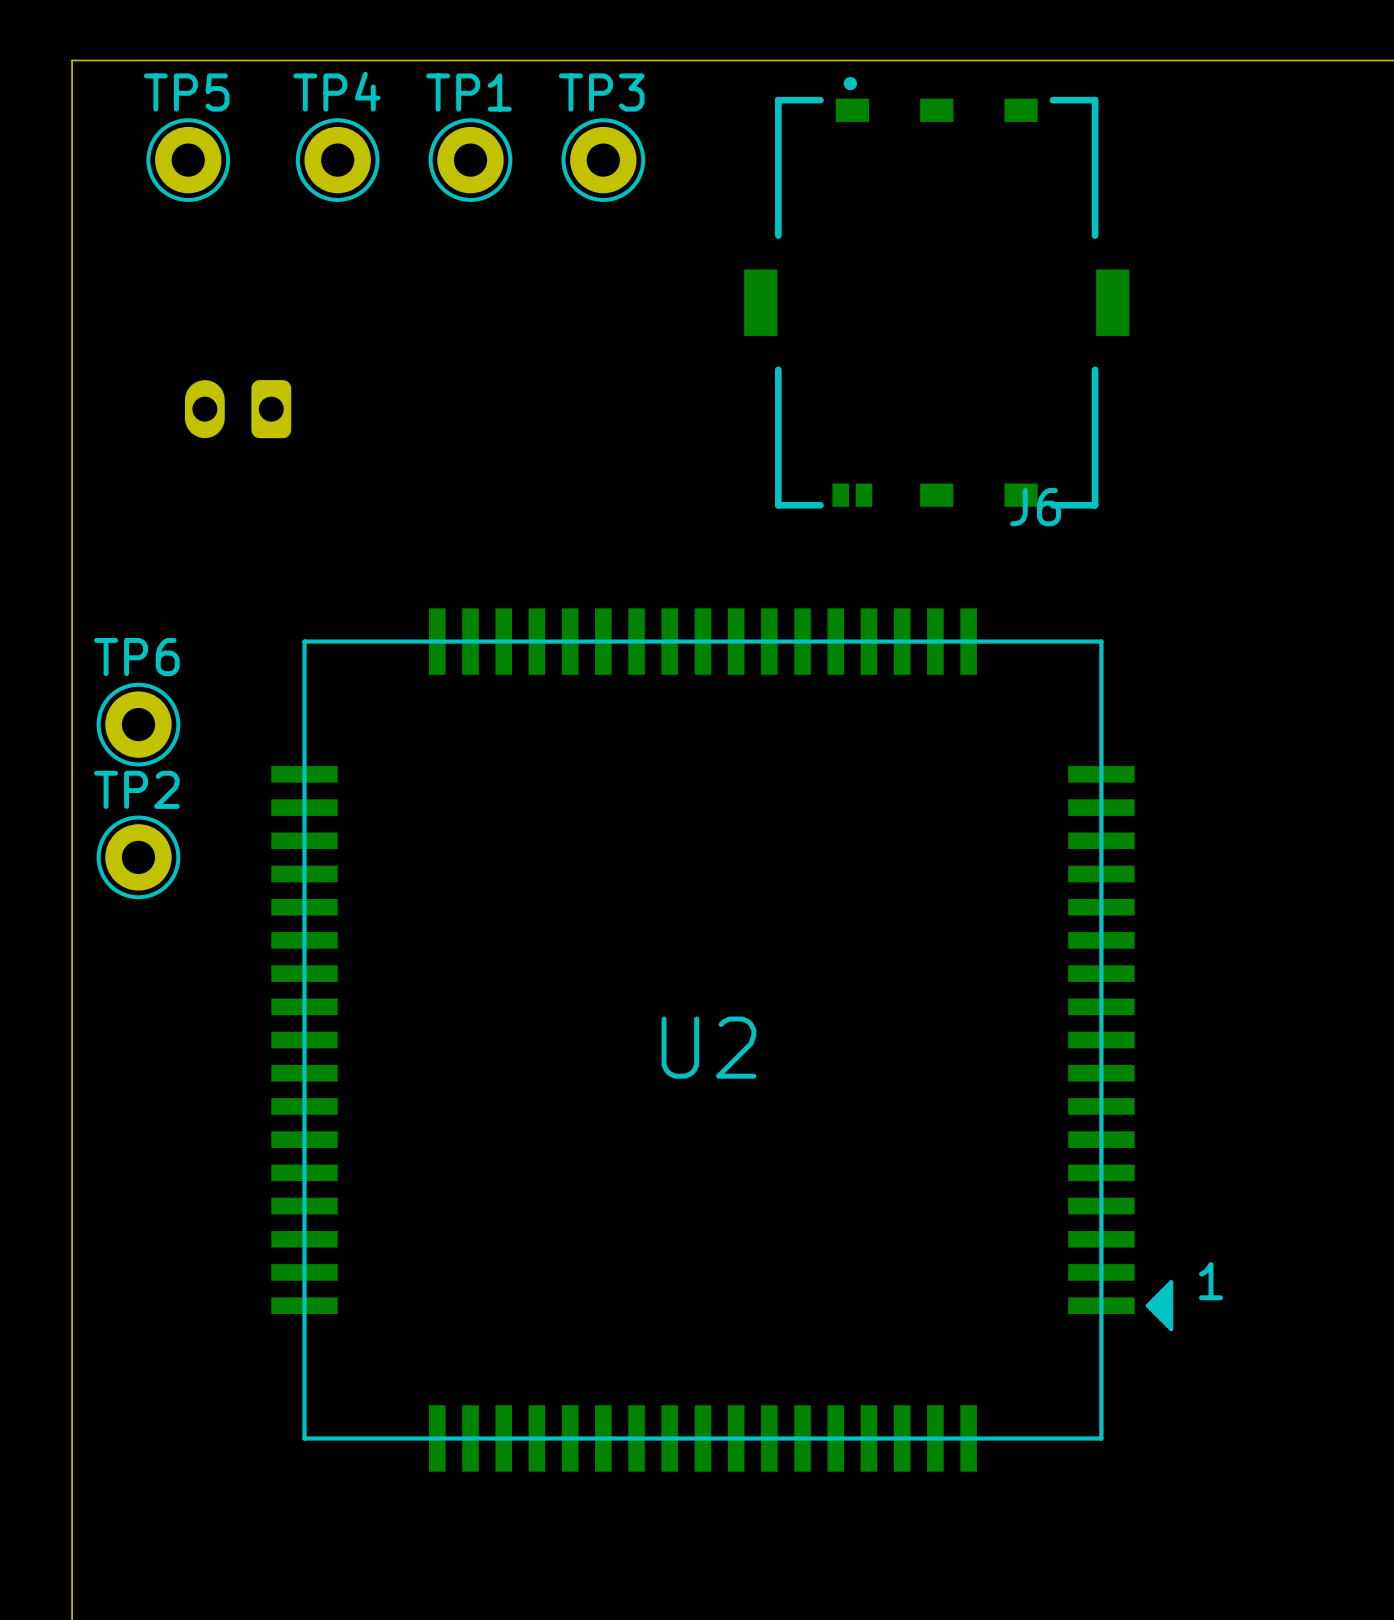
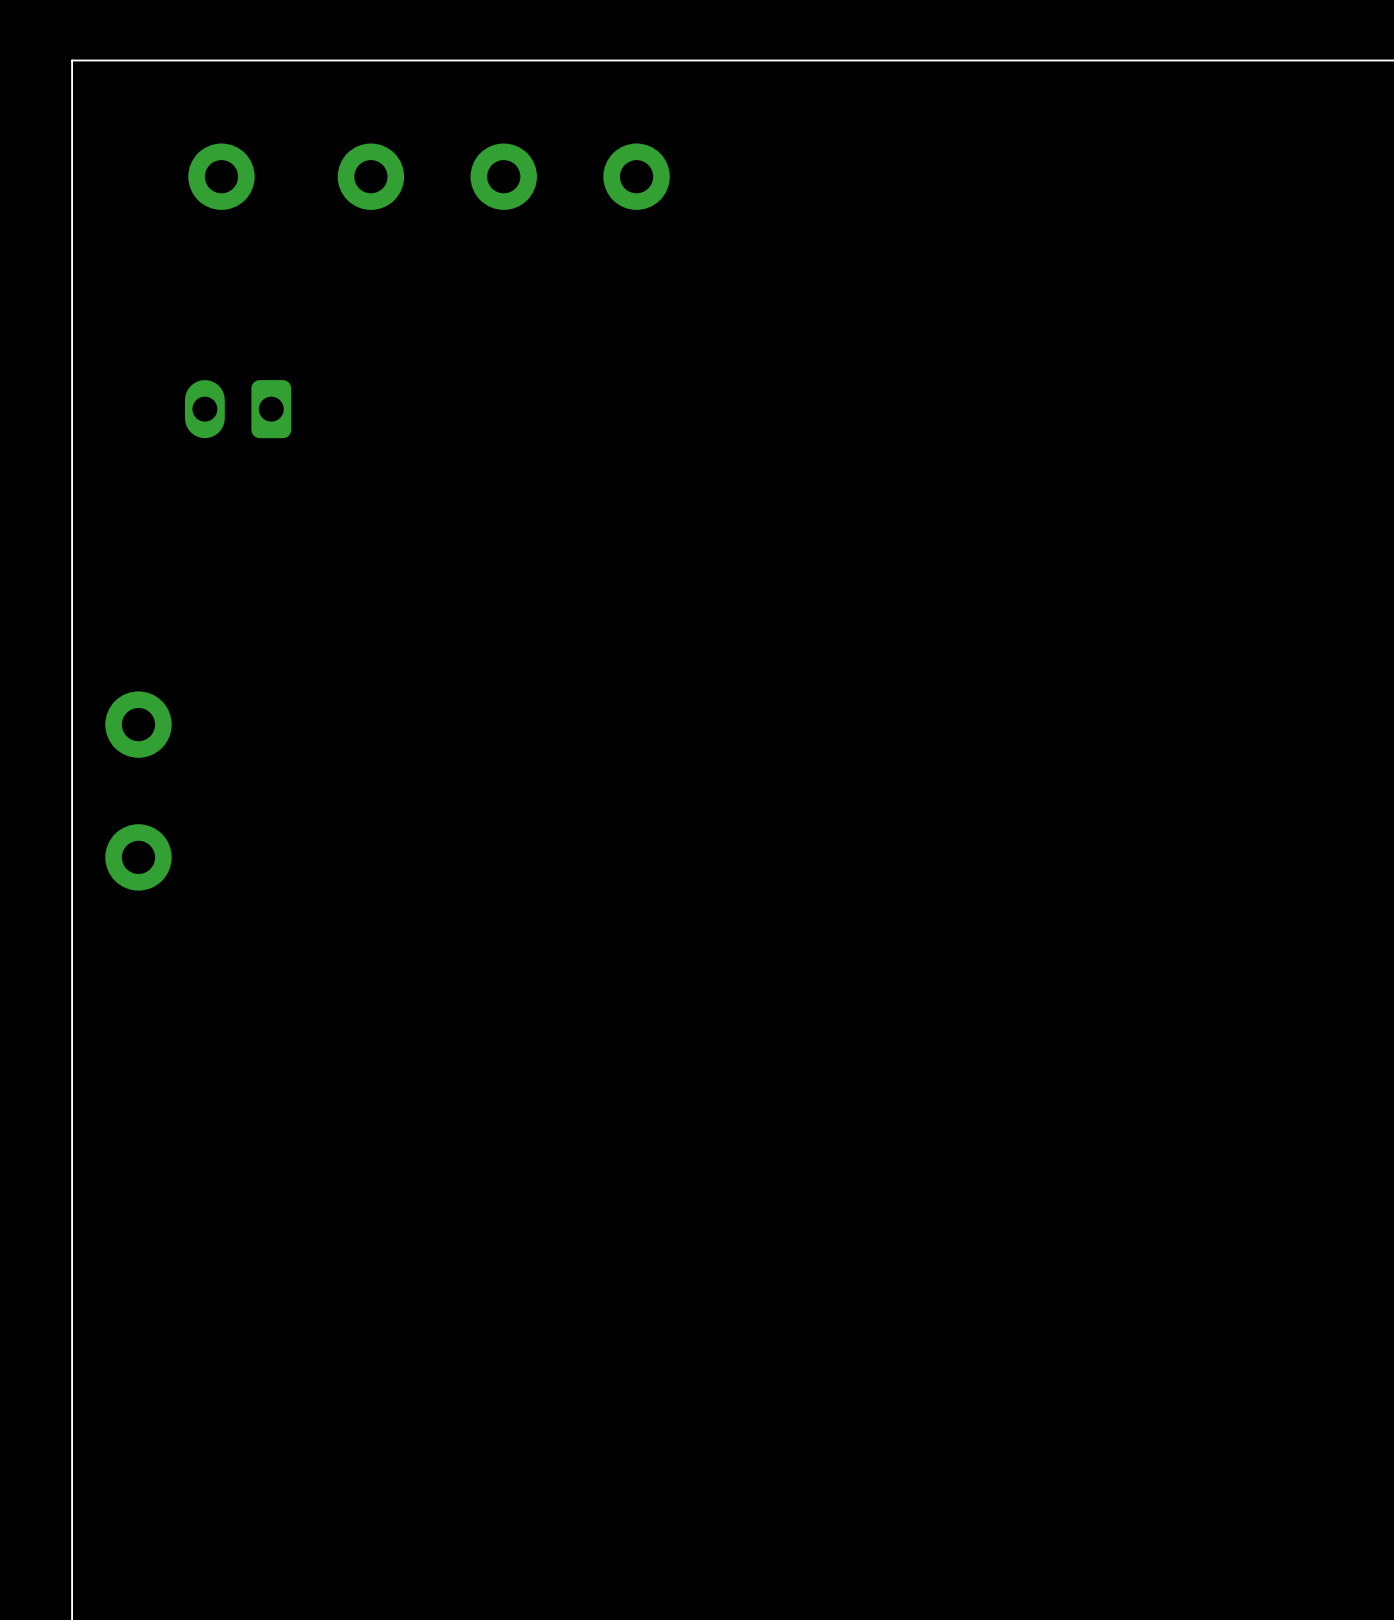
TP5 side: bottom (188, 160) -> top (221, 176)
TP4 side: bottom (337, 160) -> top (370, 176)
TP1 side: bottom (470, 160) -> top (503, 176)
TP3 side: bottom (603, 160) -> top (636, 176)
J6: (936, 292) -> none
TP6 side: bottom (138, 724) -> top (138, 724)
TP2 side: bottom (138, 857) -> top (138, 857)
U2: (722, 1040) -> none

